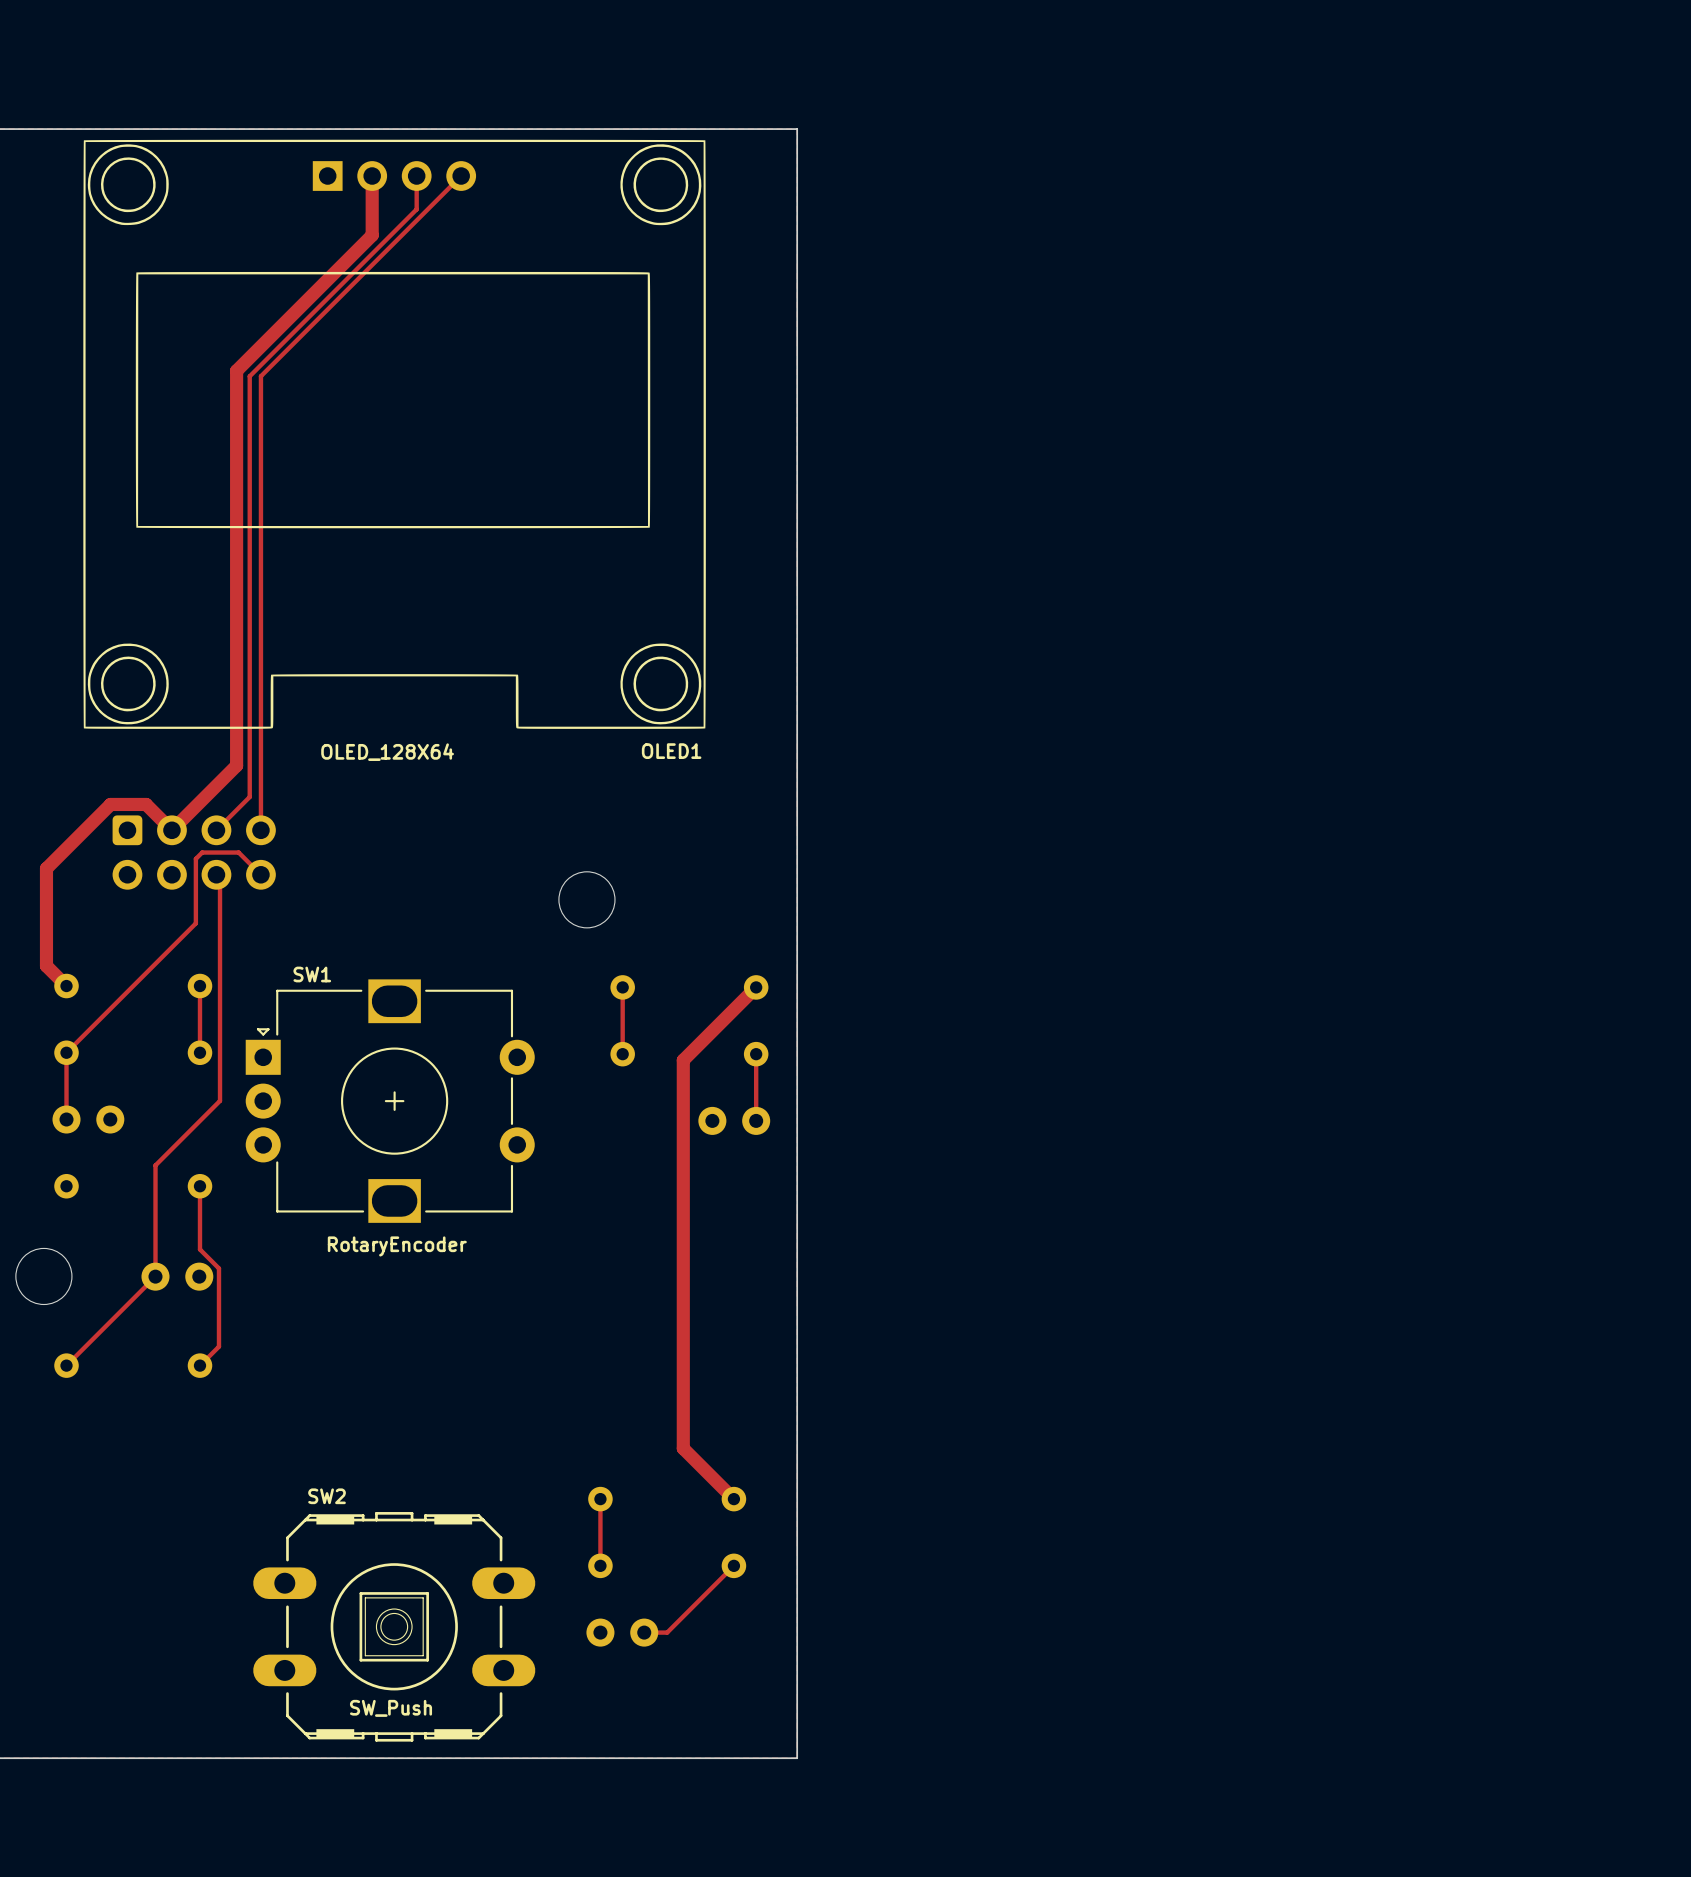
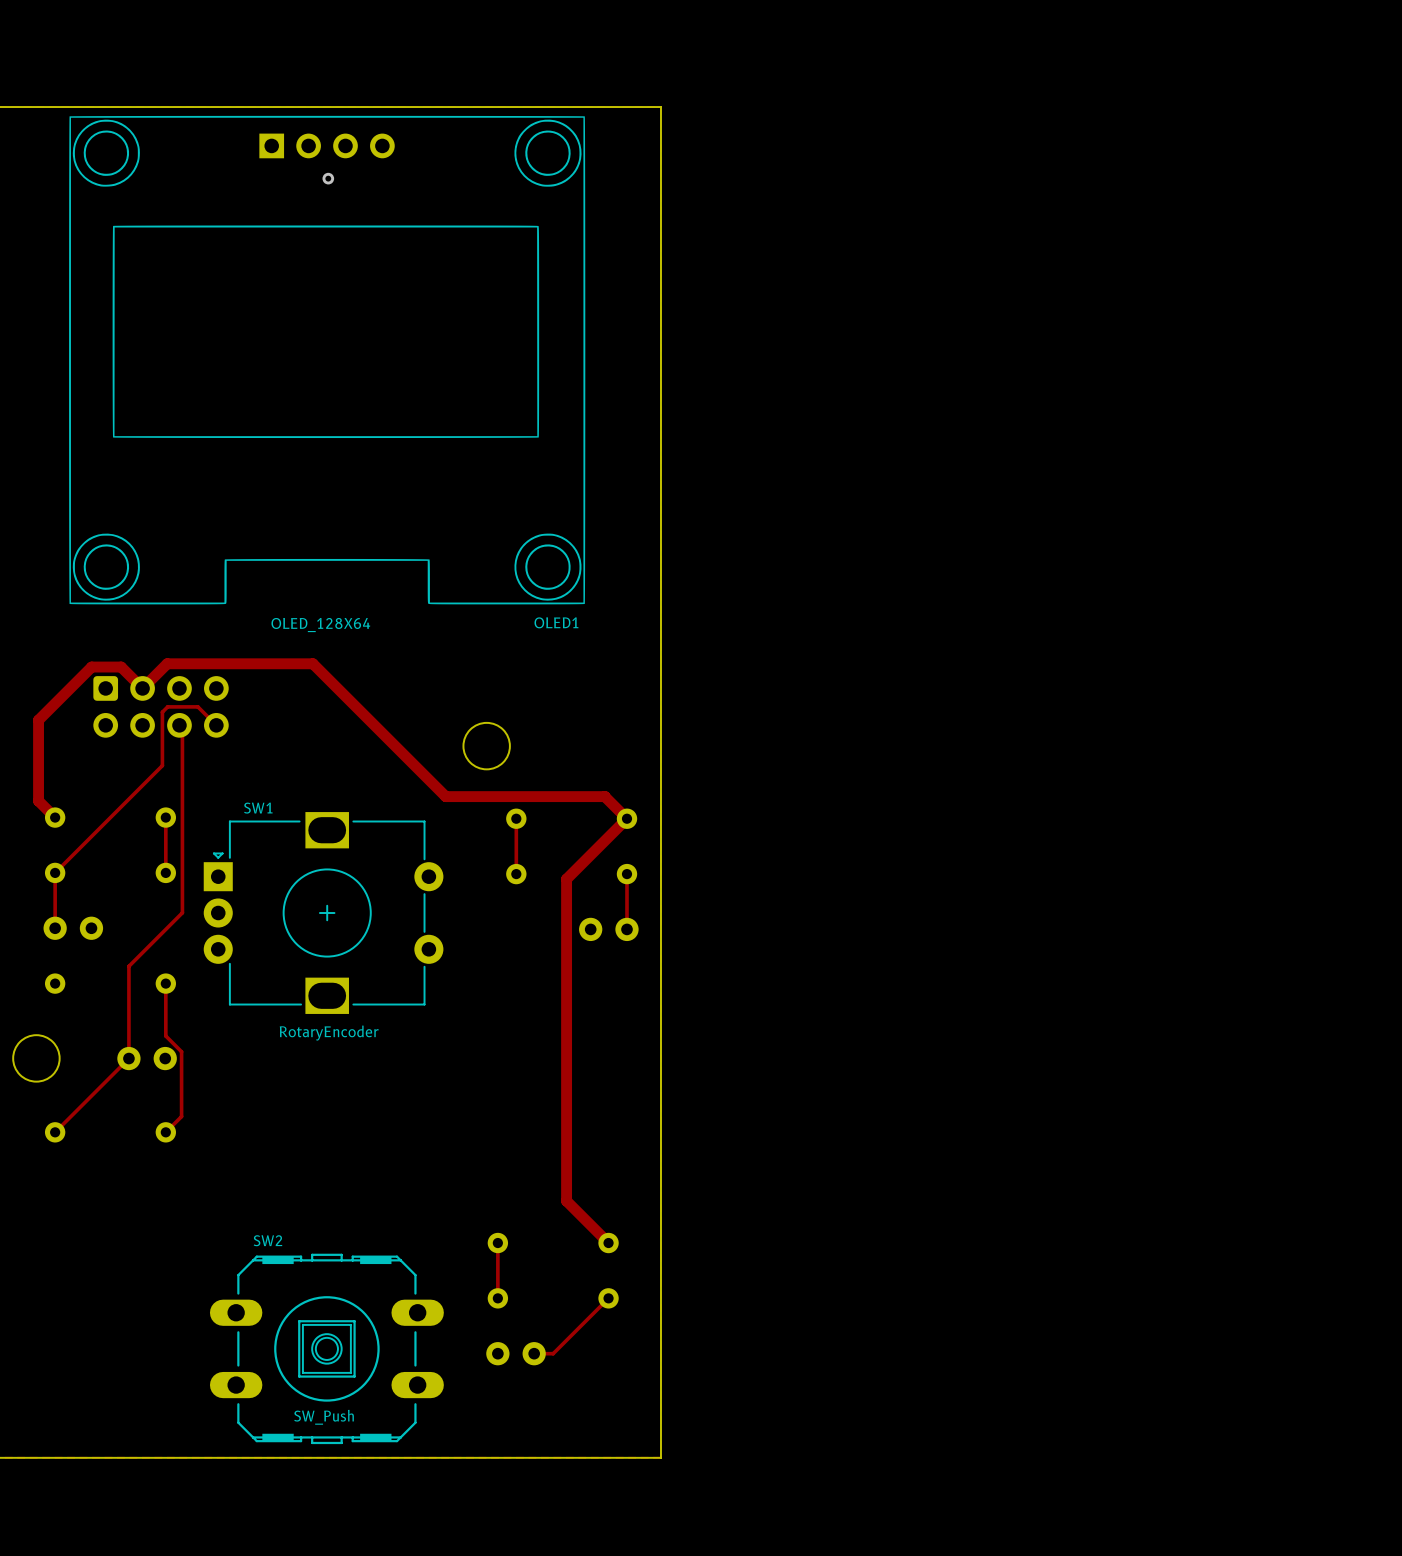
track: (372, 176) (372, 235) (236, 370) (236, 765) (201, 800) -> (605, 796) (445, 796) (312, 663) (167, 663)
track: (416, 176) (416, 209) (249, 376) (249, 797) (216, 830) -> none
track: (461, 176) (260, 376) (260, 830) -> none
via: none -> (328, 178)
track: none -> (605, 796) (626, 818)

